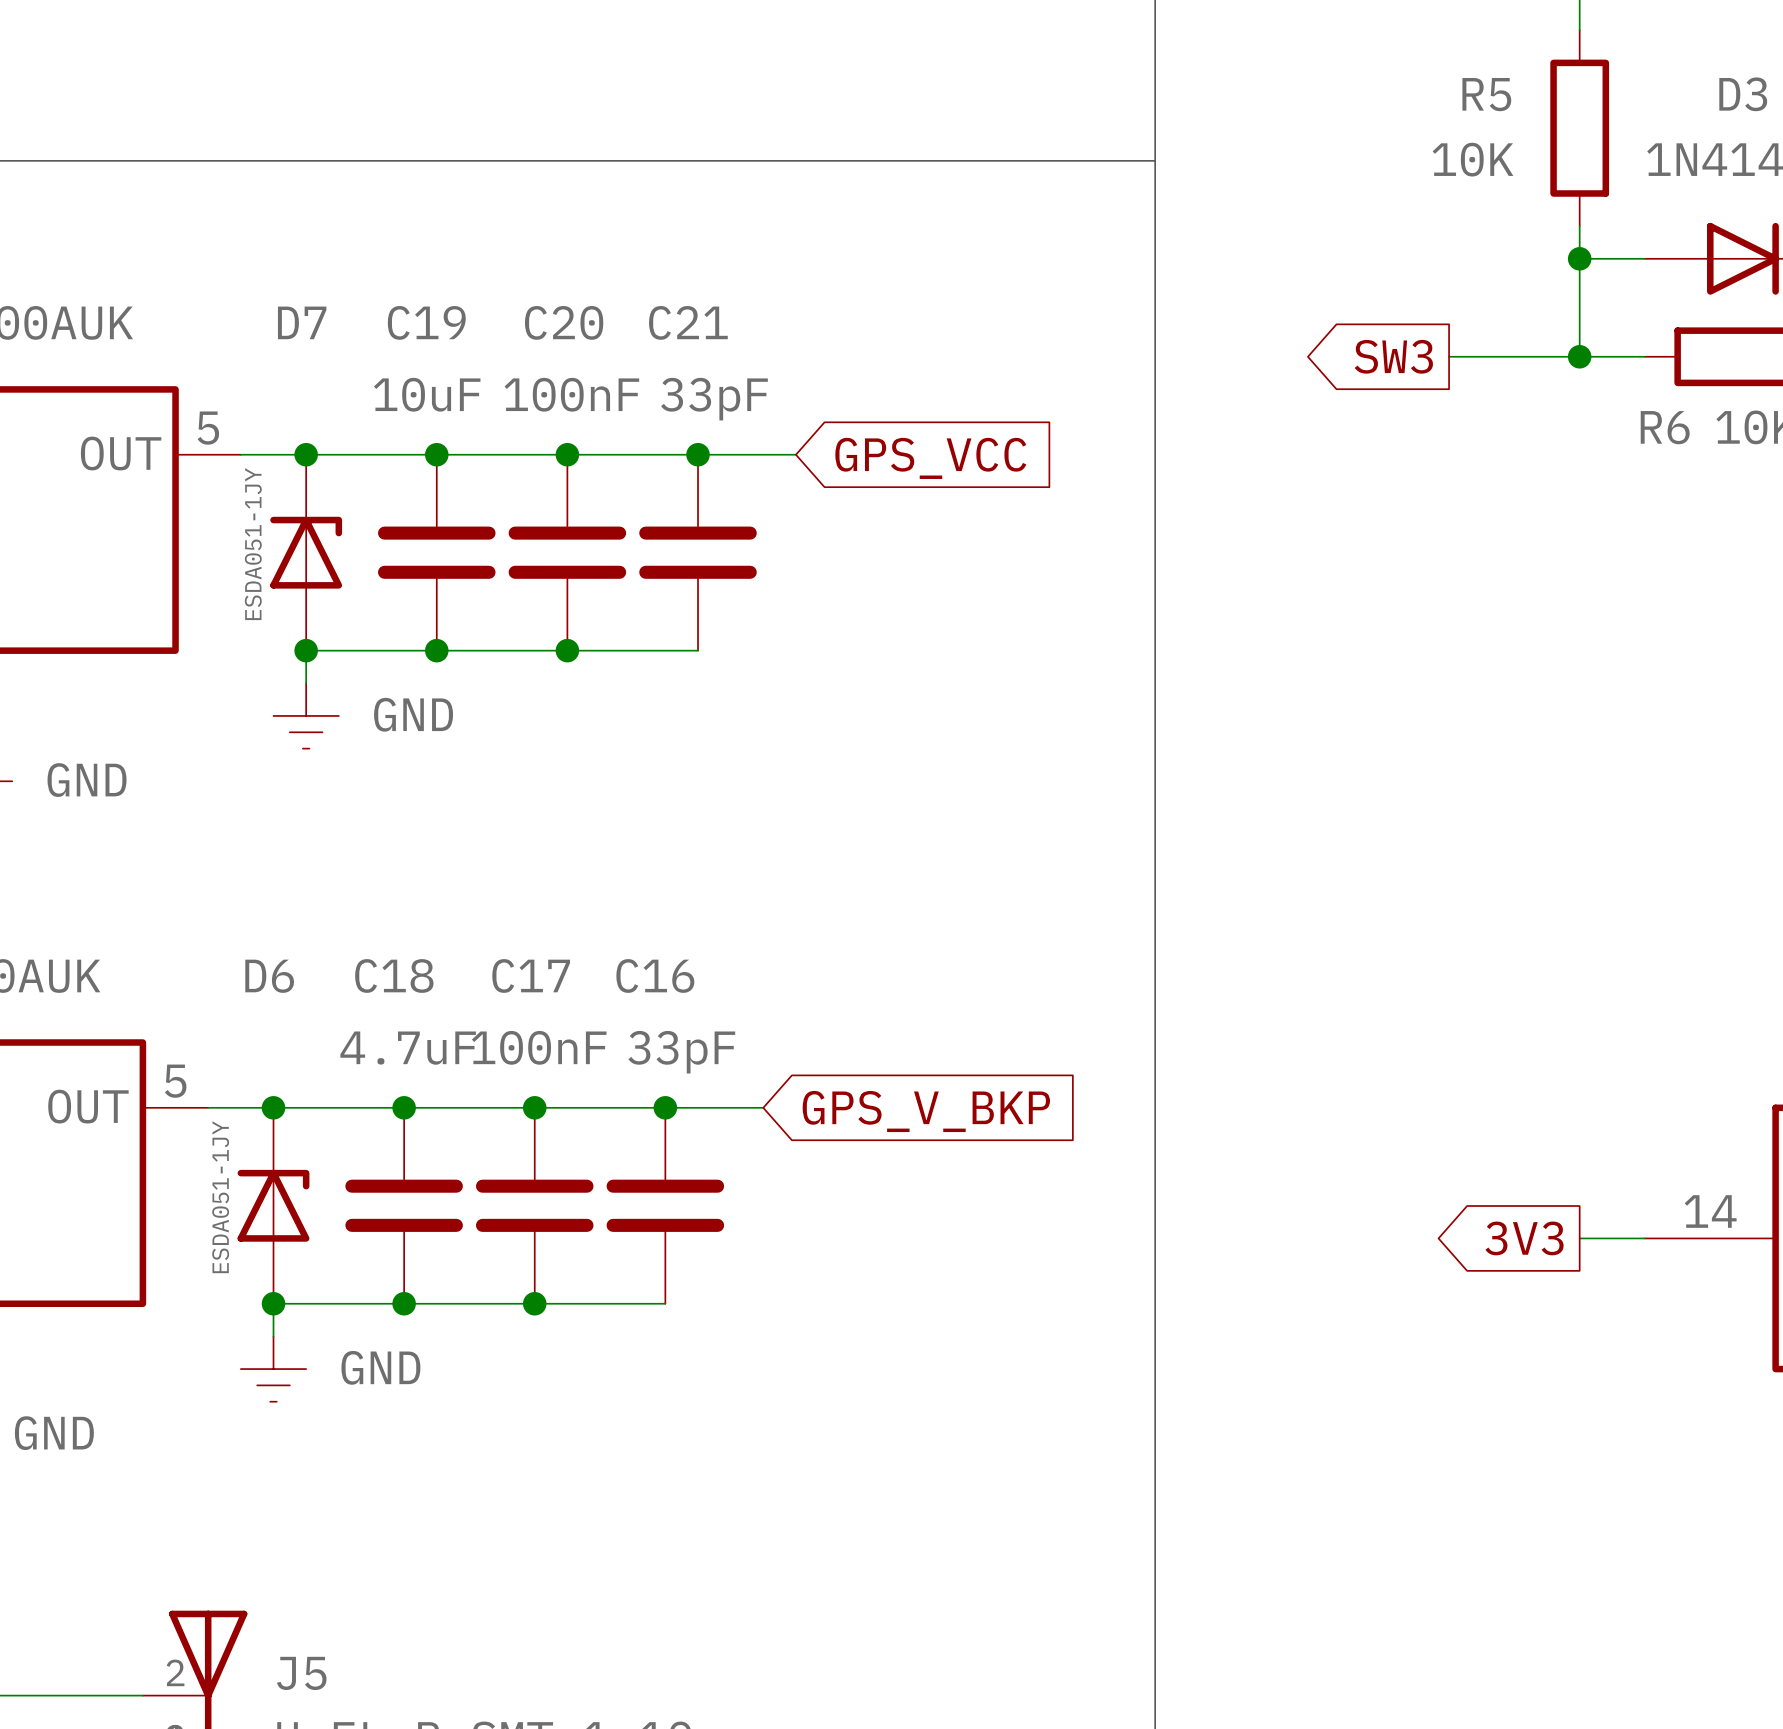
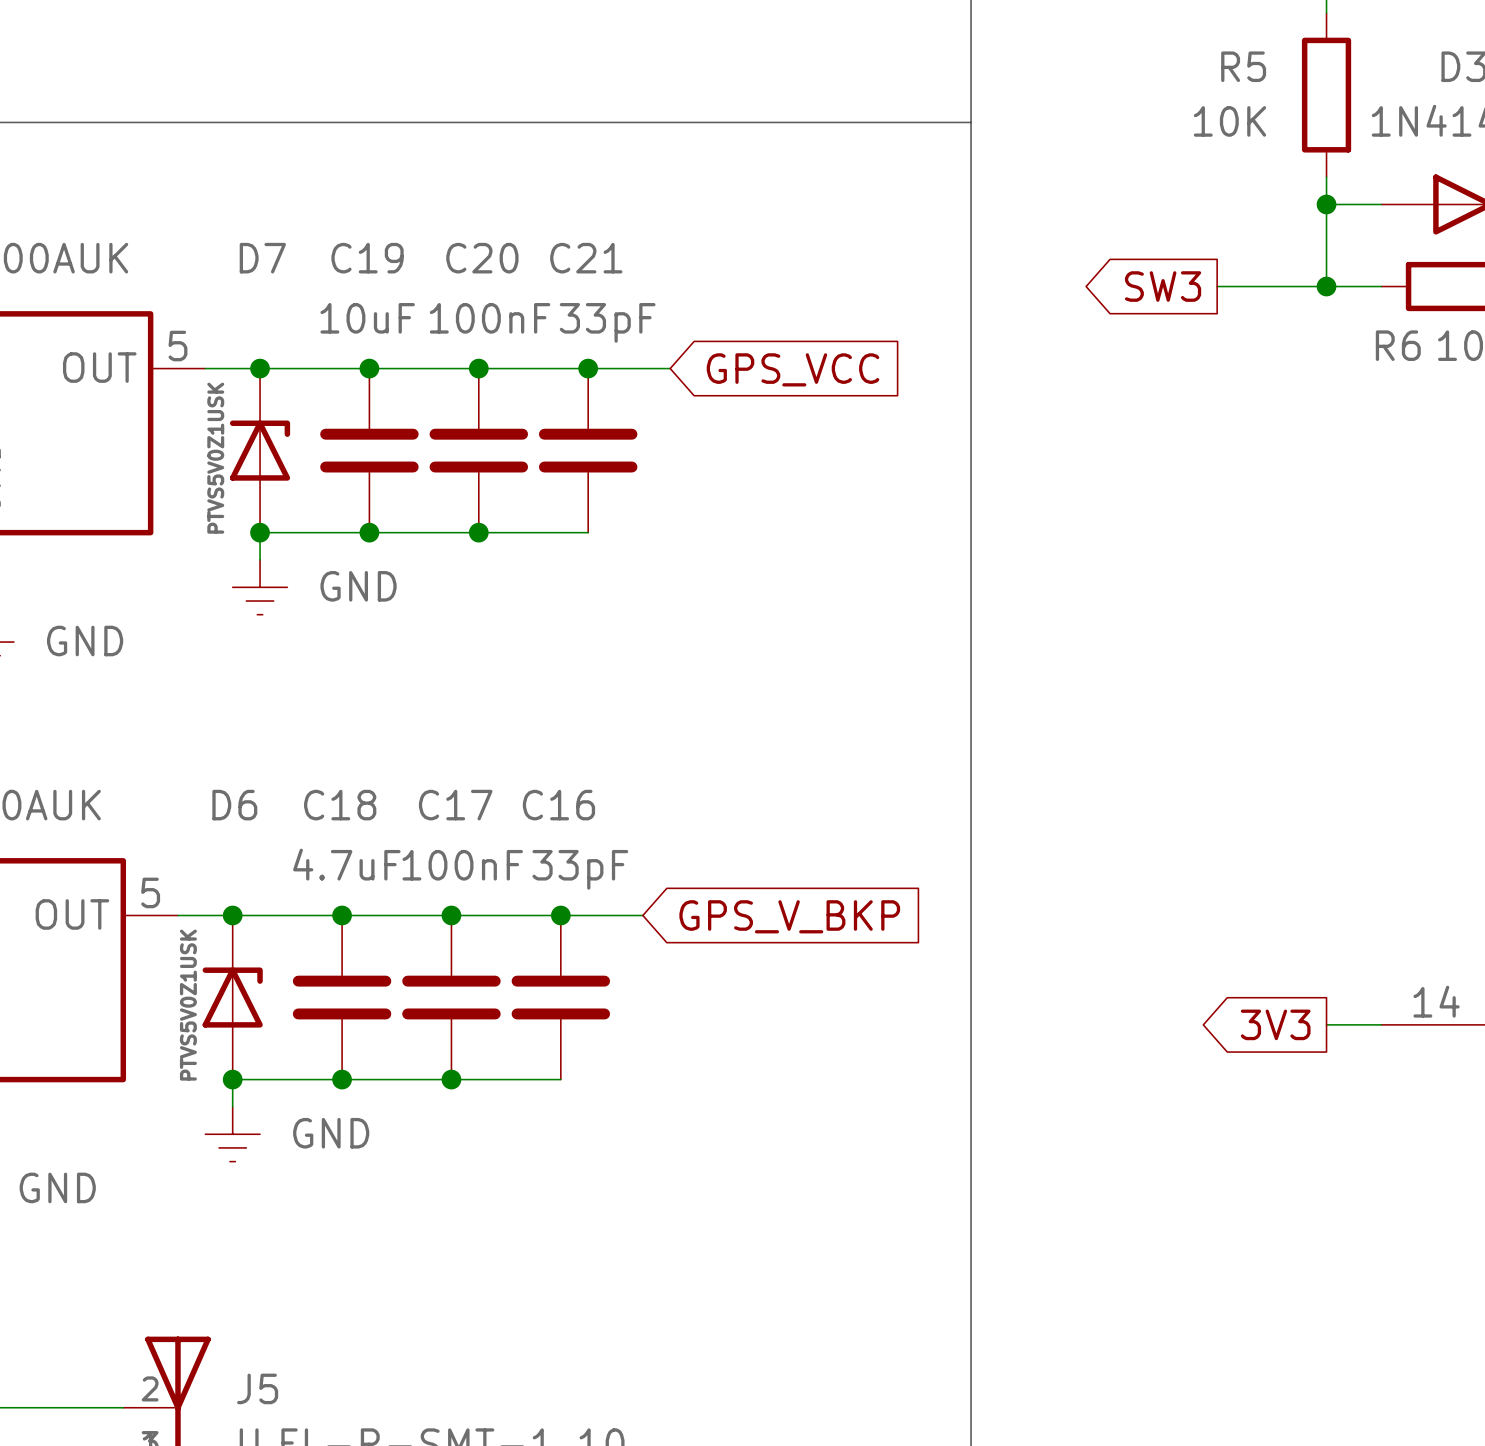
D7 value: ESDA051-1JY (253, 544) -> PTVS5V0Z1USK (215, 458)
D6 value: ESDA051-1JY (220, 1197) -> PTVS5V0Z1USK (188, 1005)

